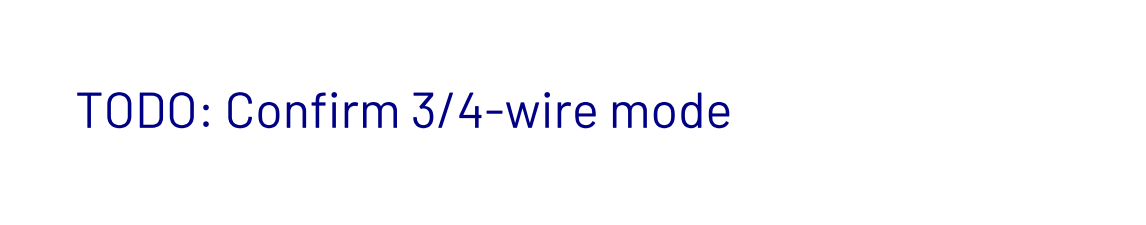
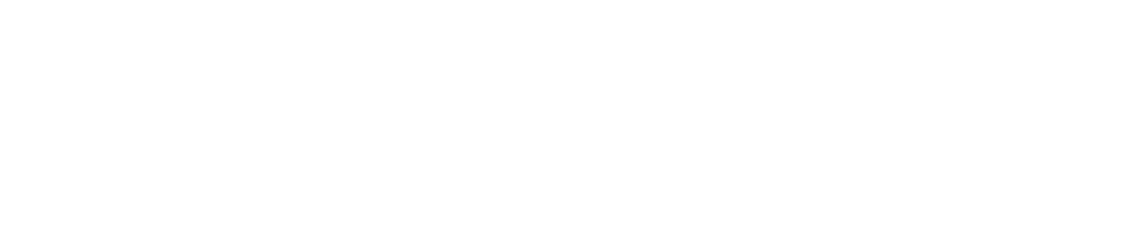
text: TODO: Confirm 3/4-wire mode (403, 110) -> none

